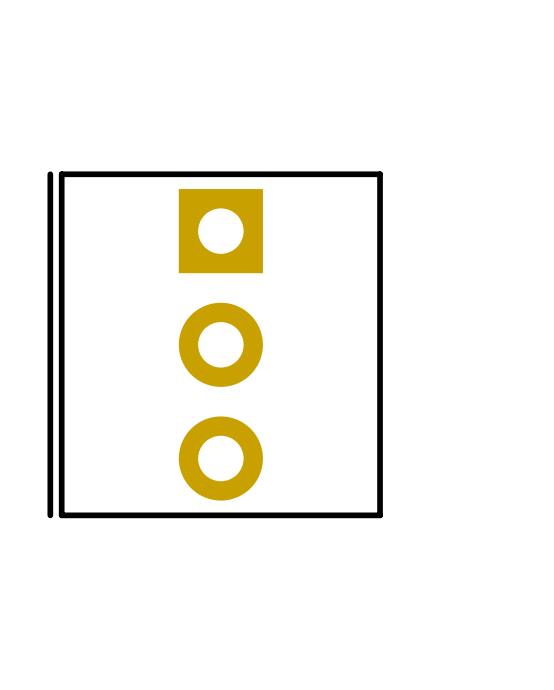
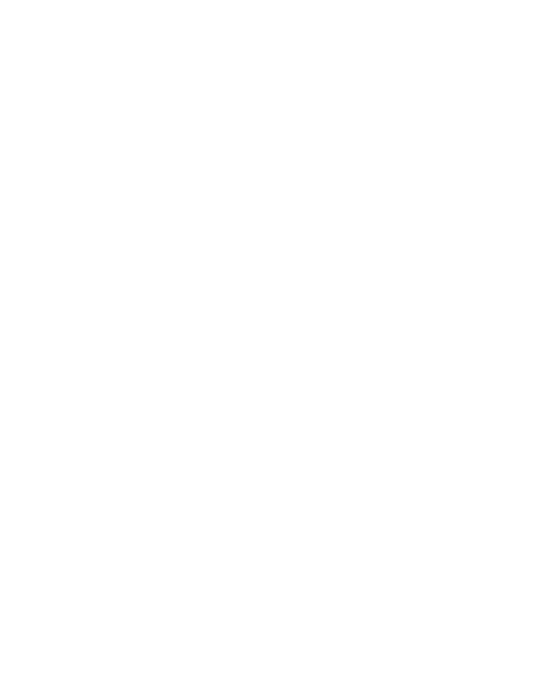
part: (215, 344) -> none

